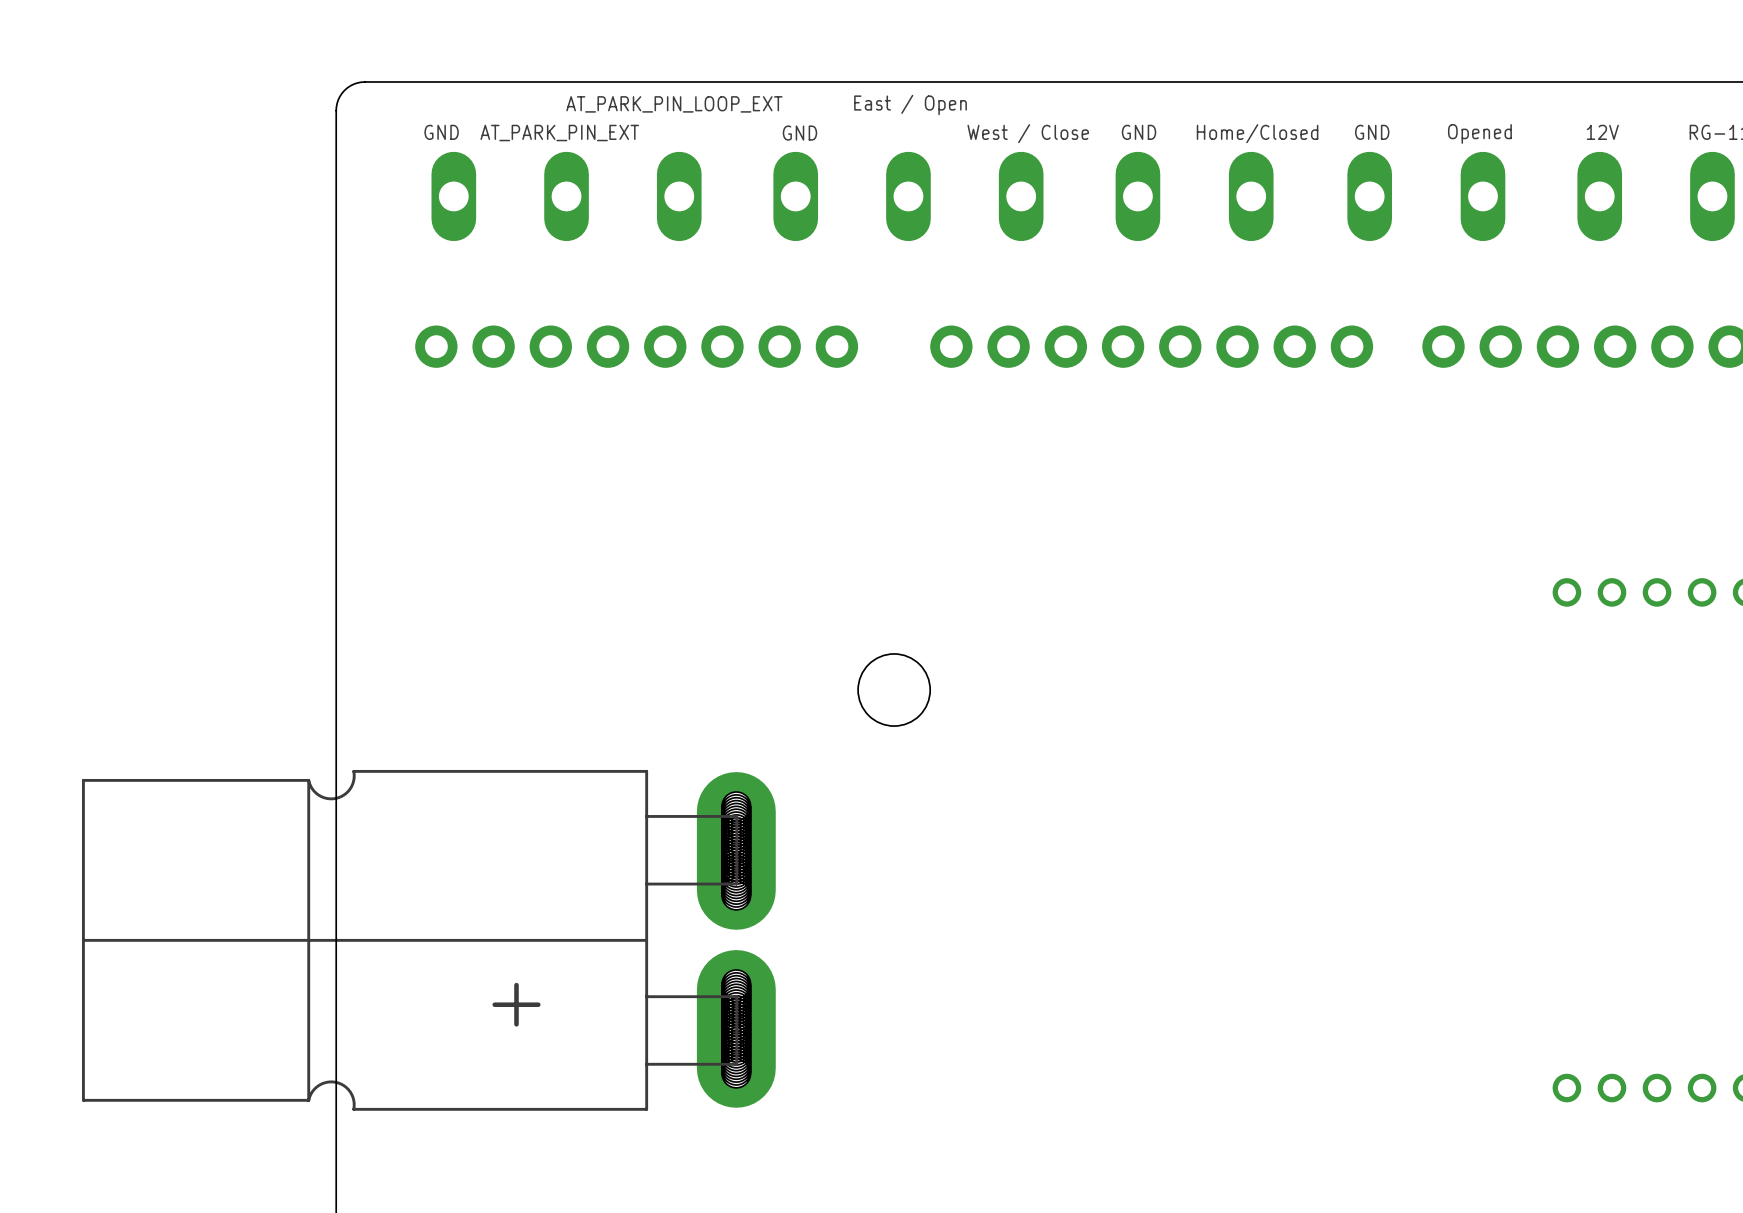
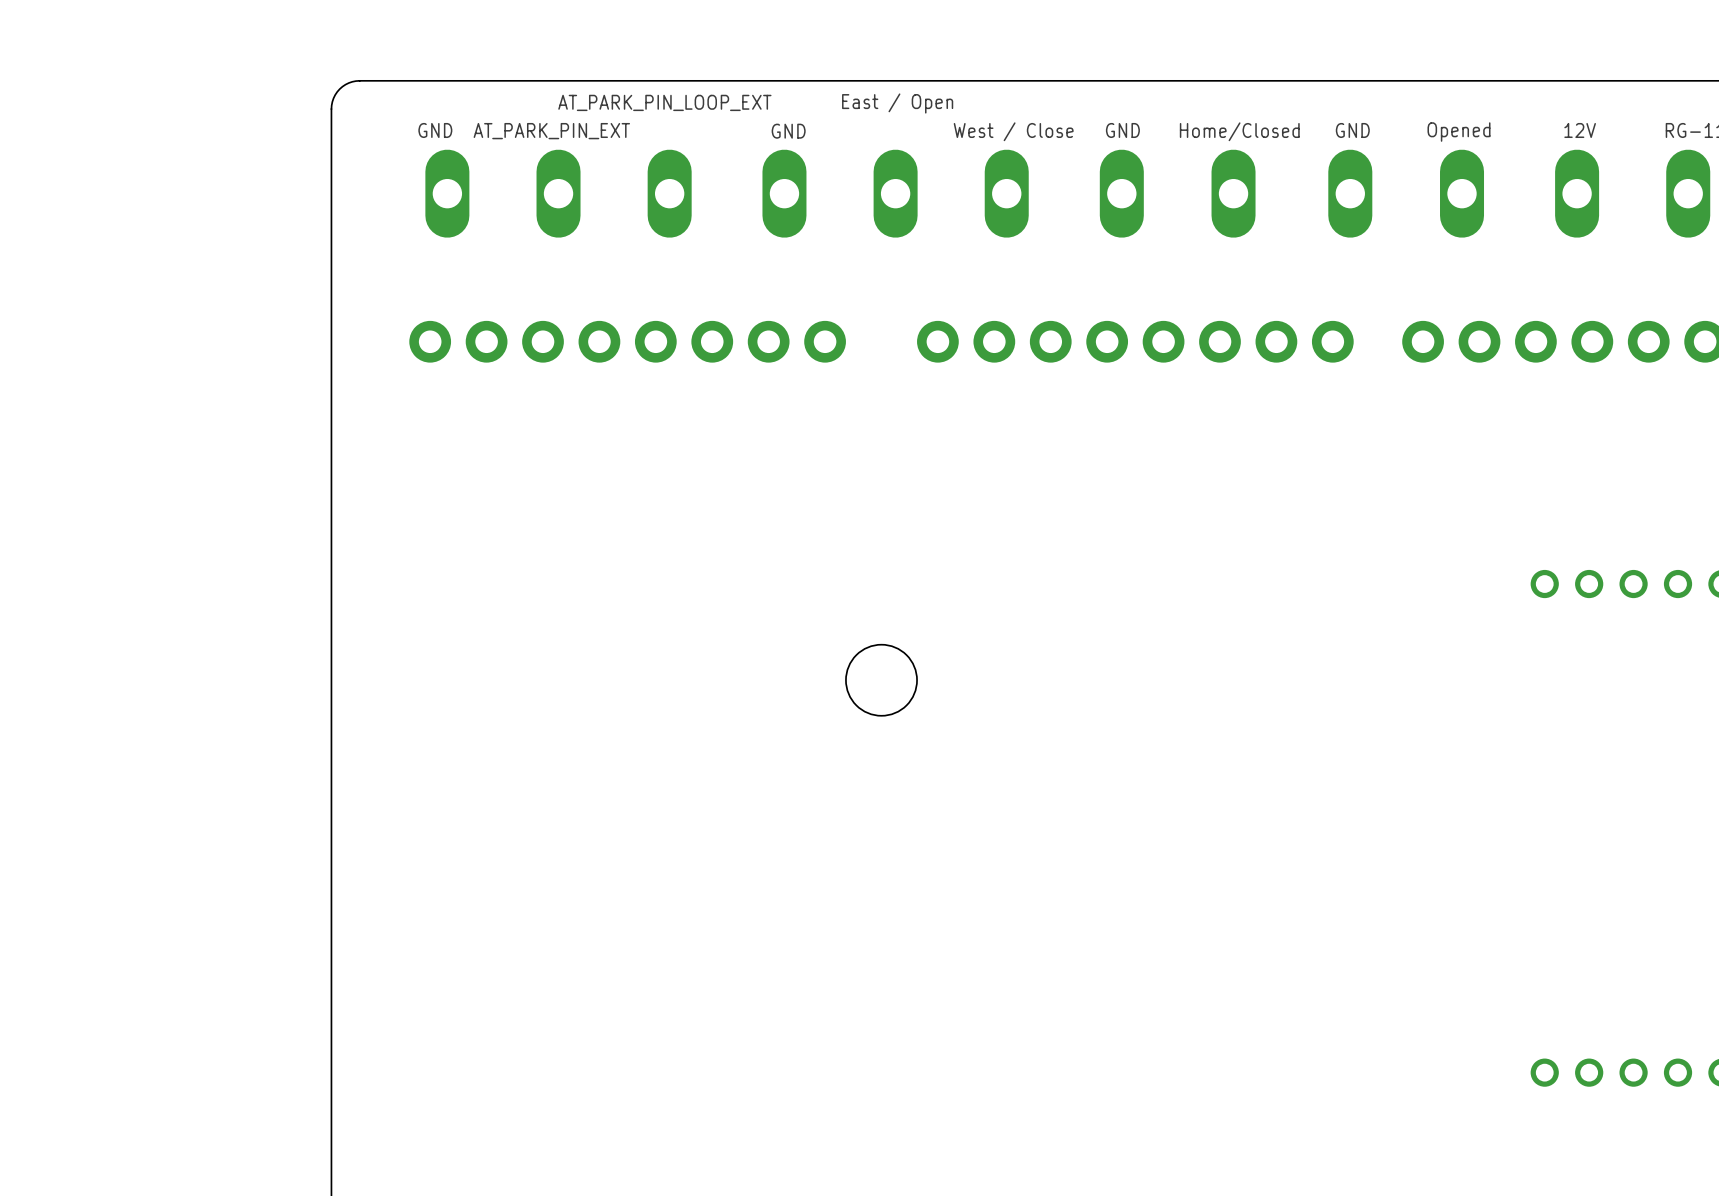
part: (428, 940) -> none

